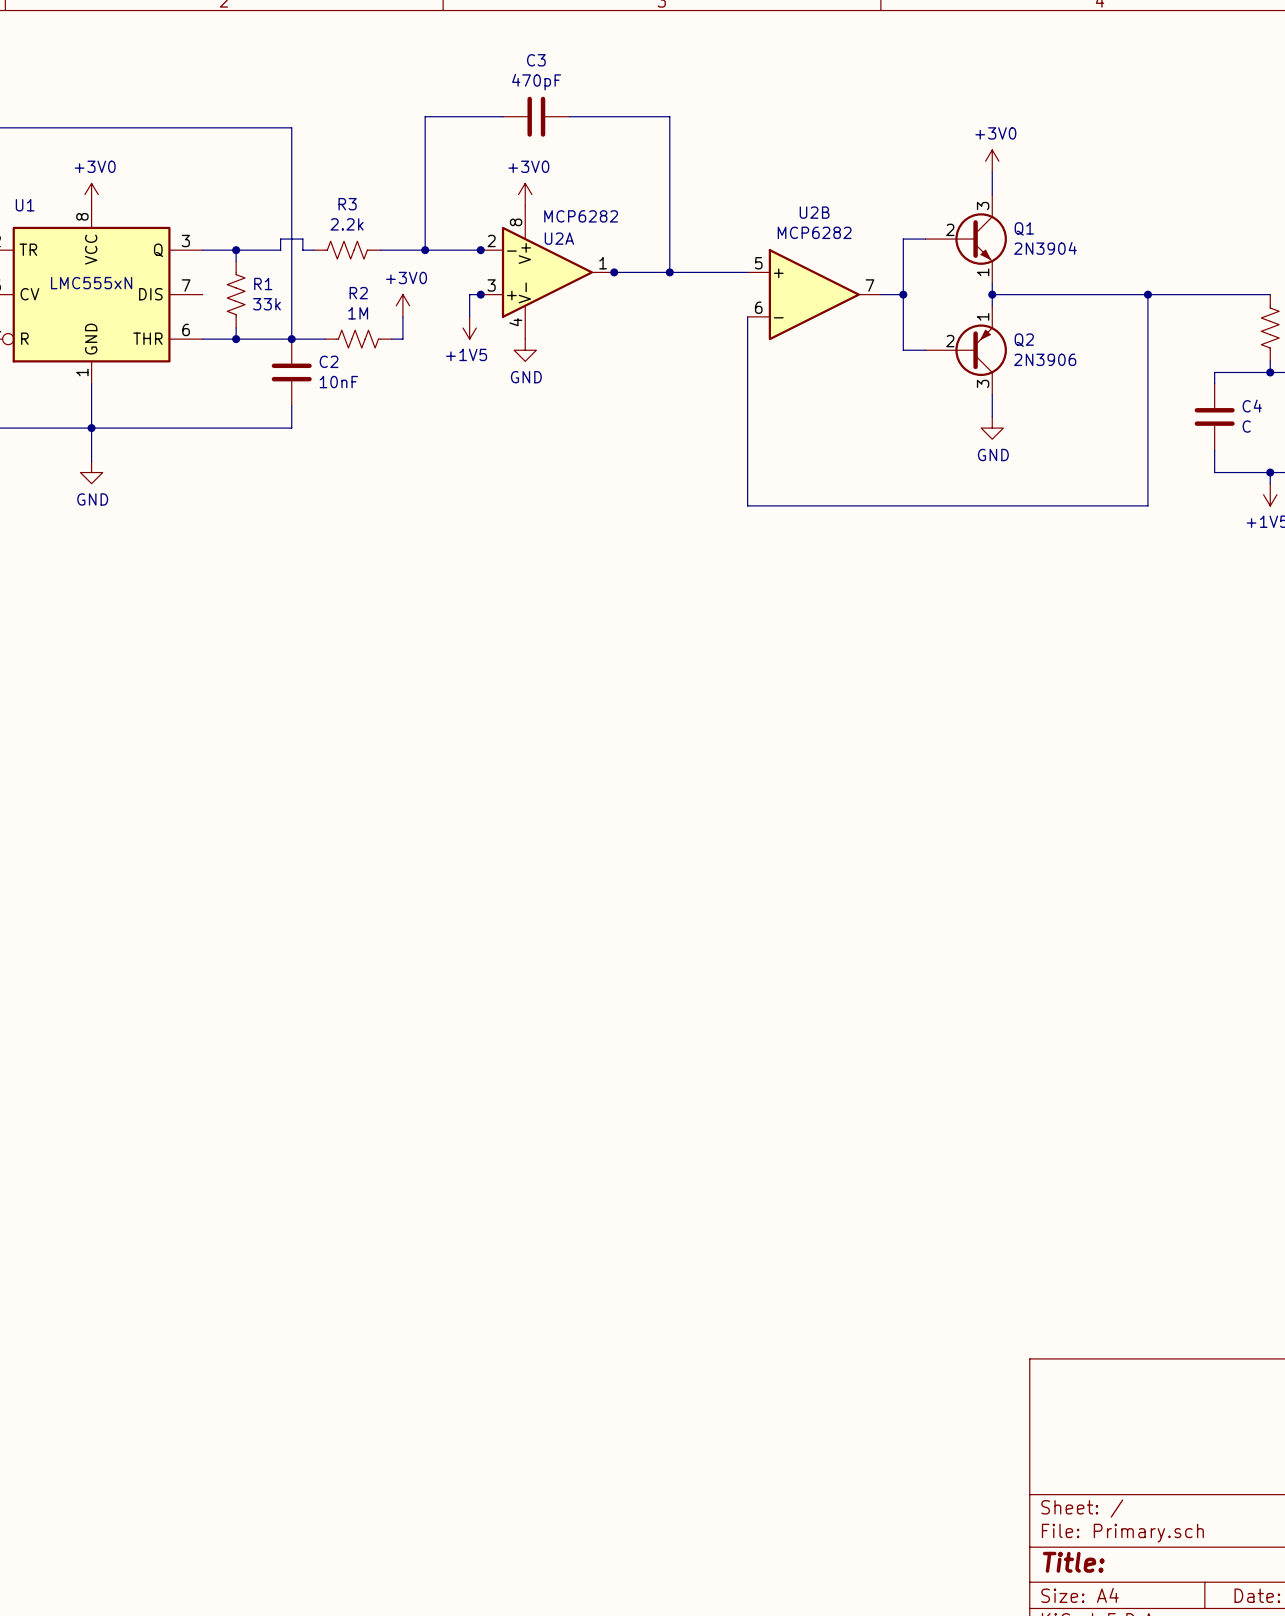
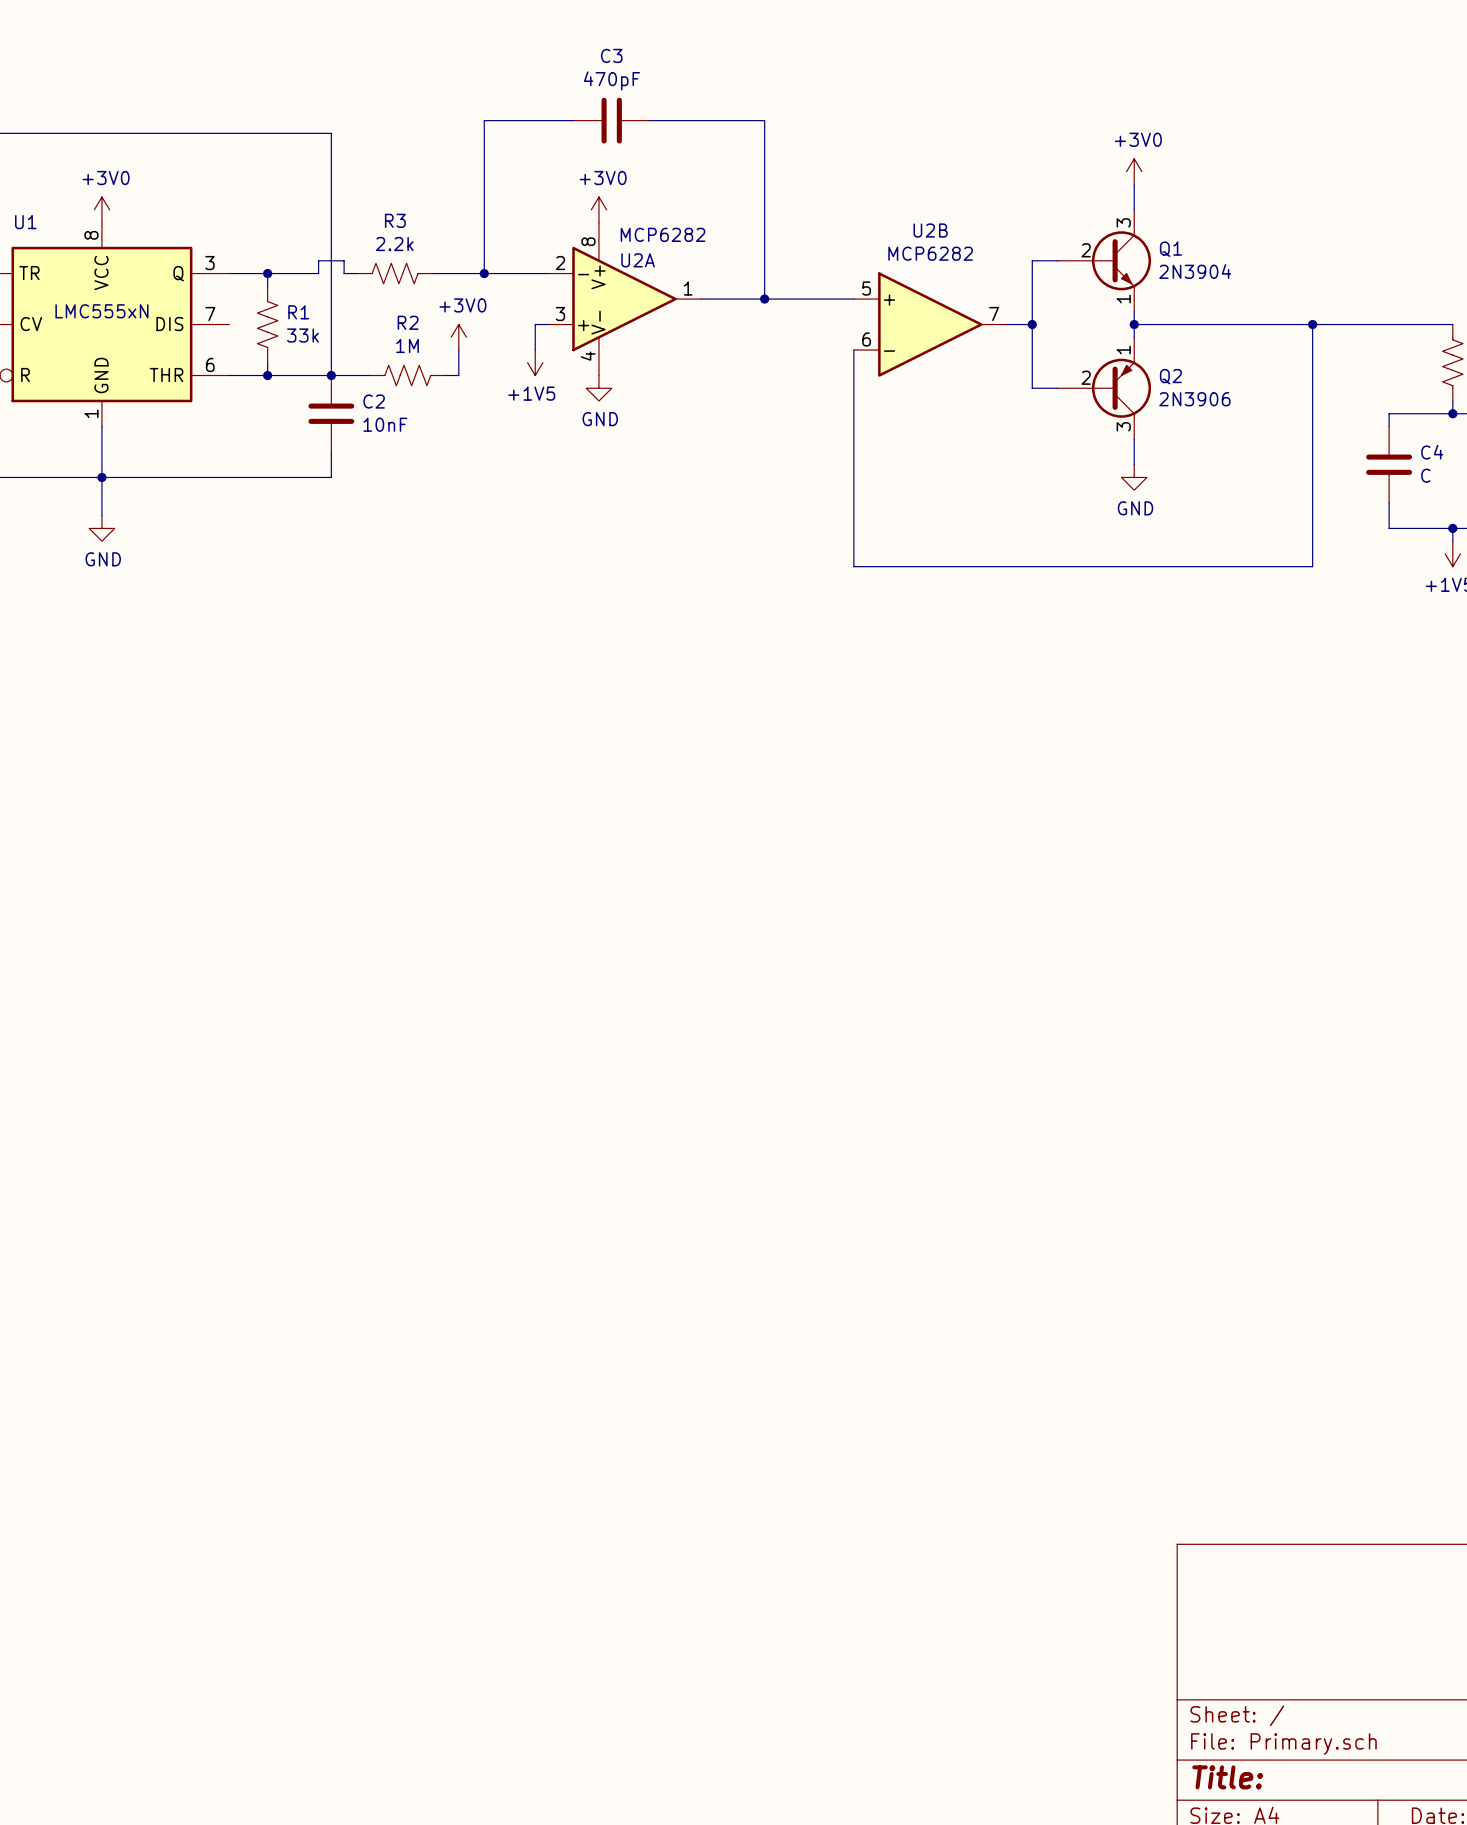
junction: (480, 250) -> none
junction: (614, 272) -> none
junction: (480, 294) -> none

